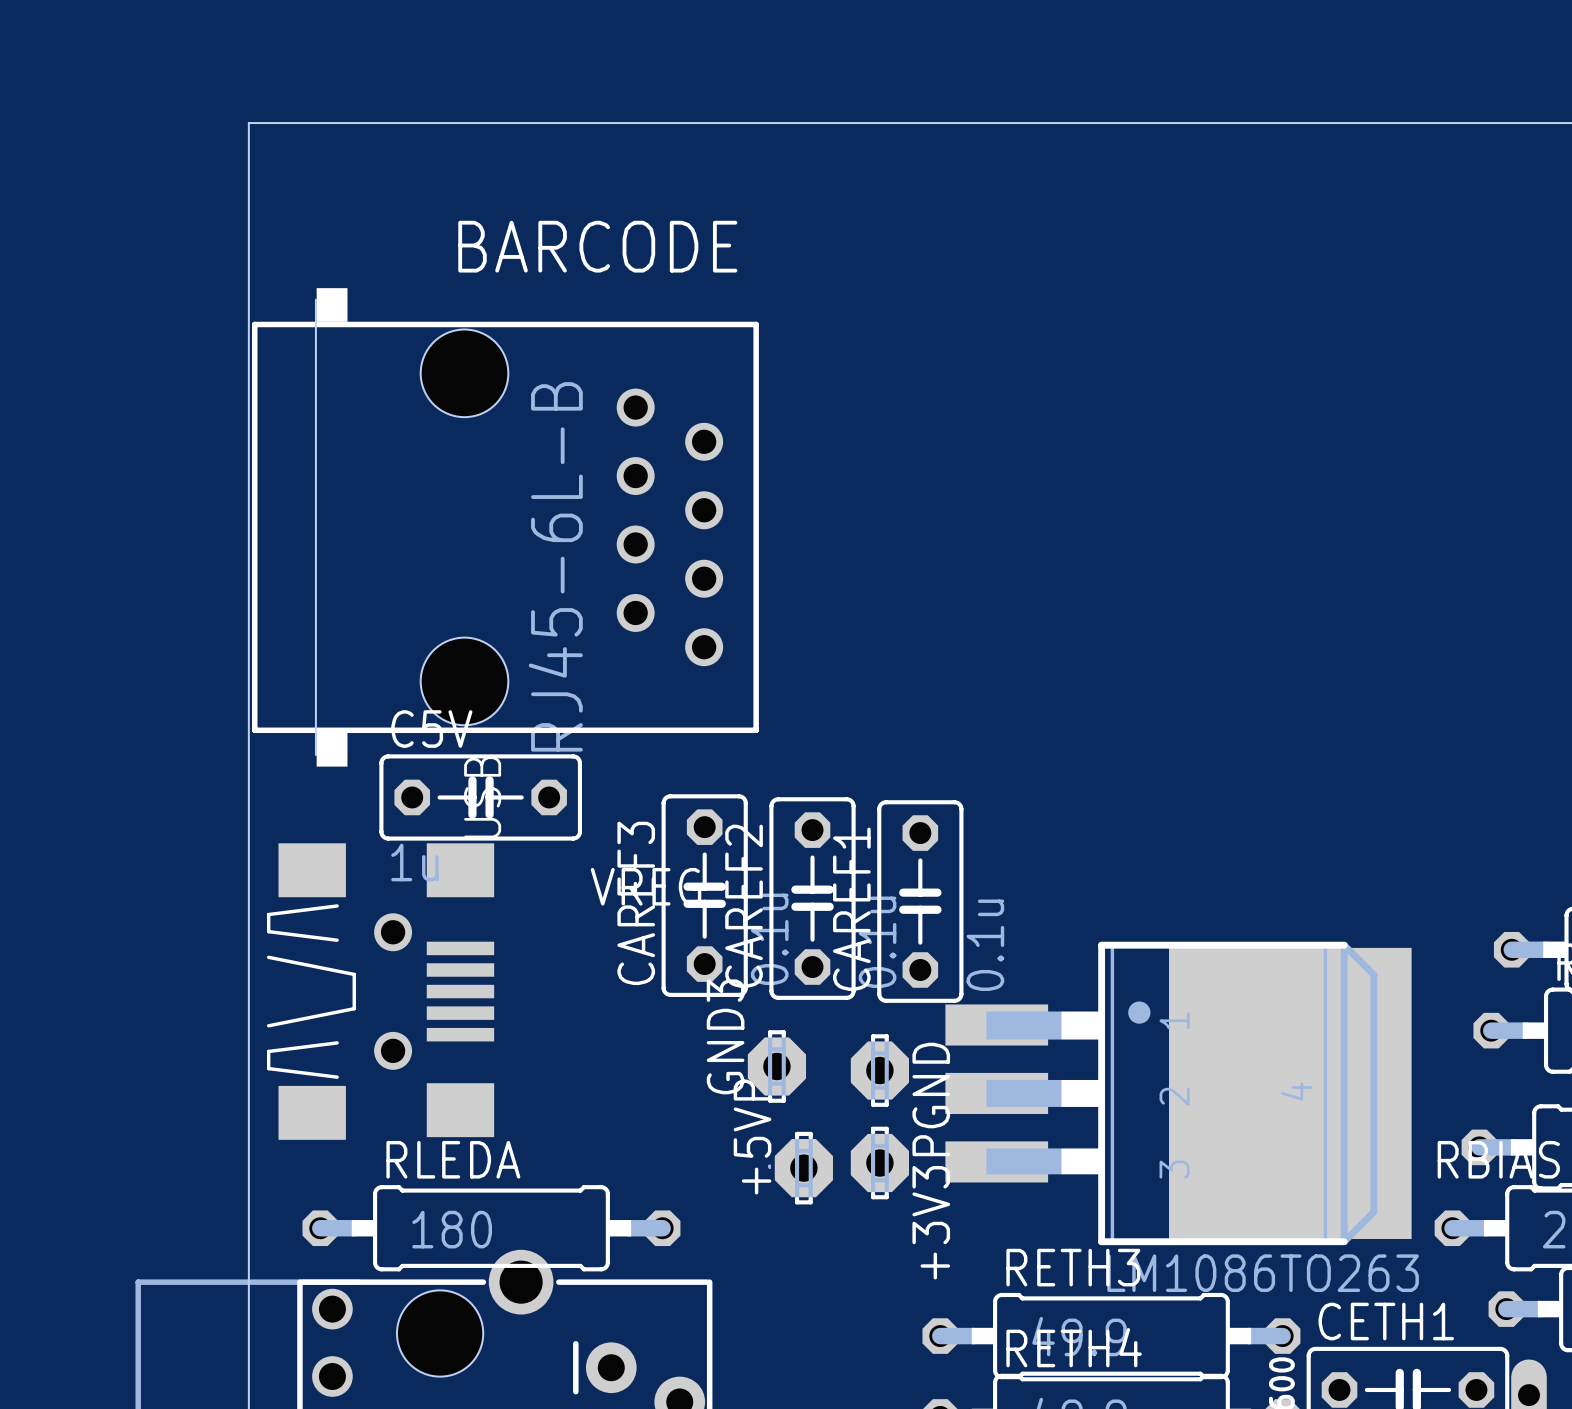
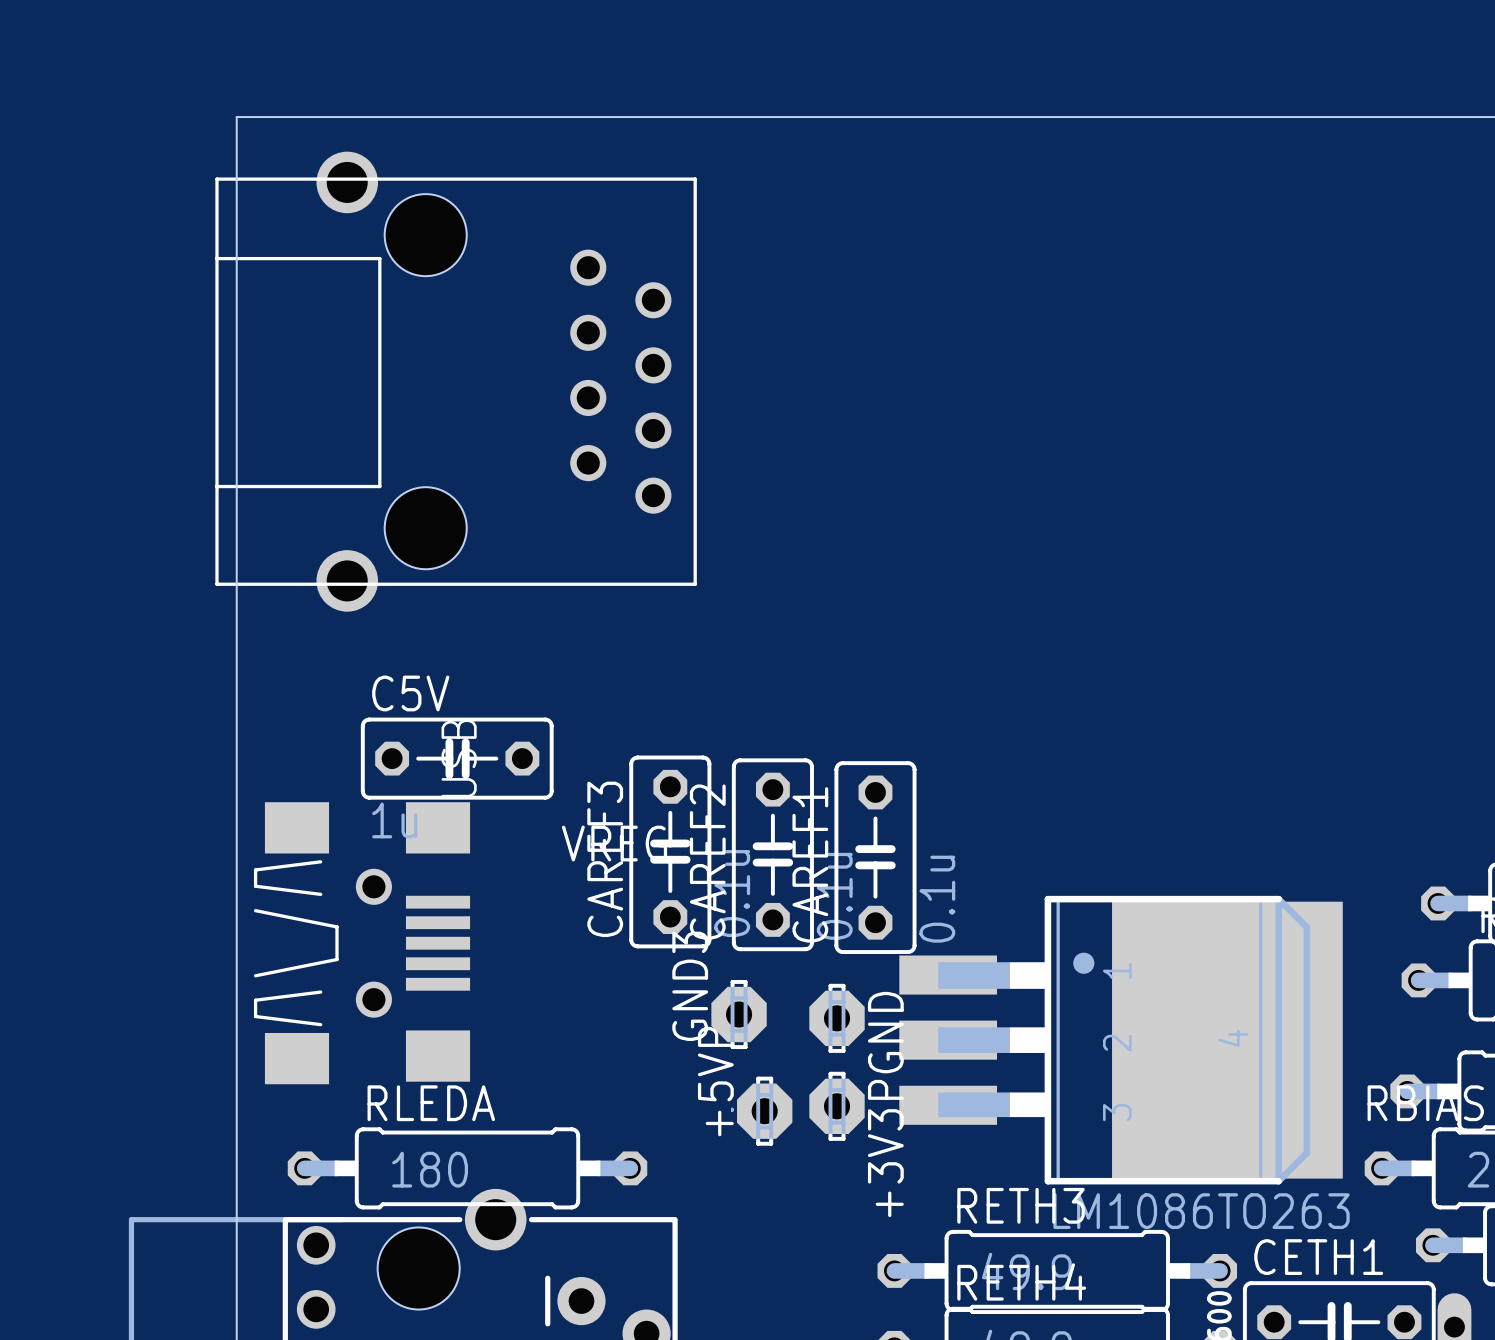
part: none -> (456, 381)
BARCODE: RJ45-6L-B (505, 527) -> none

